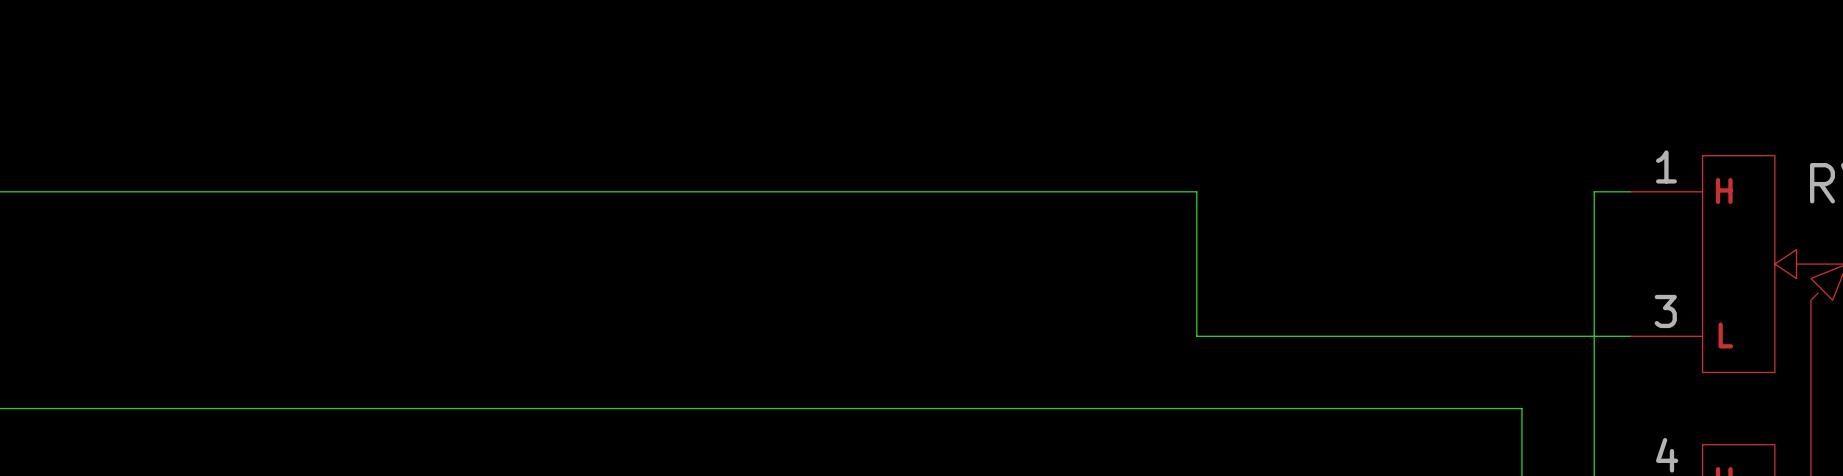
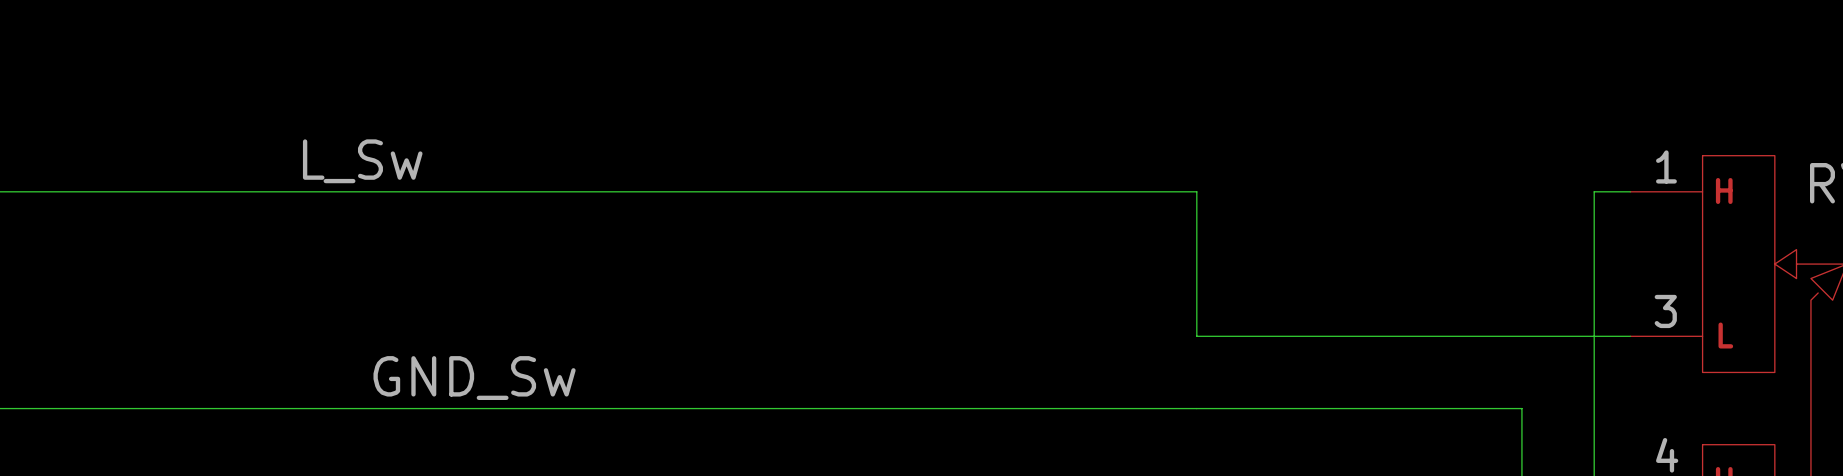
label: none -> L_Sw (362, 161)
label: none -> GND_Sw (474, 378)

